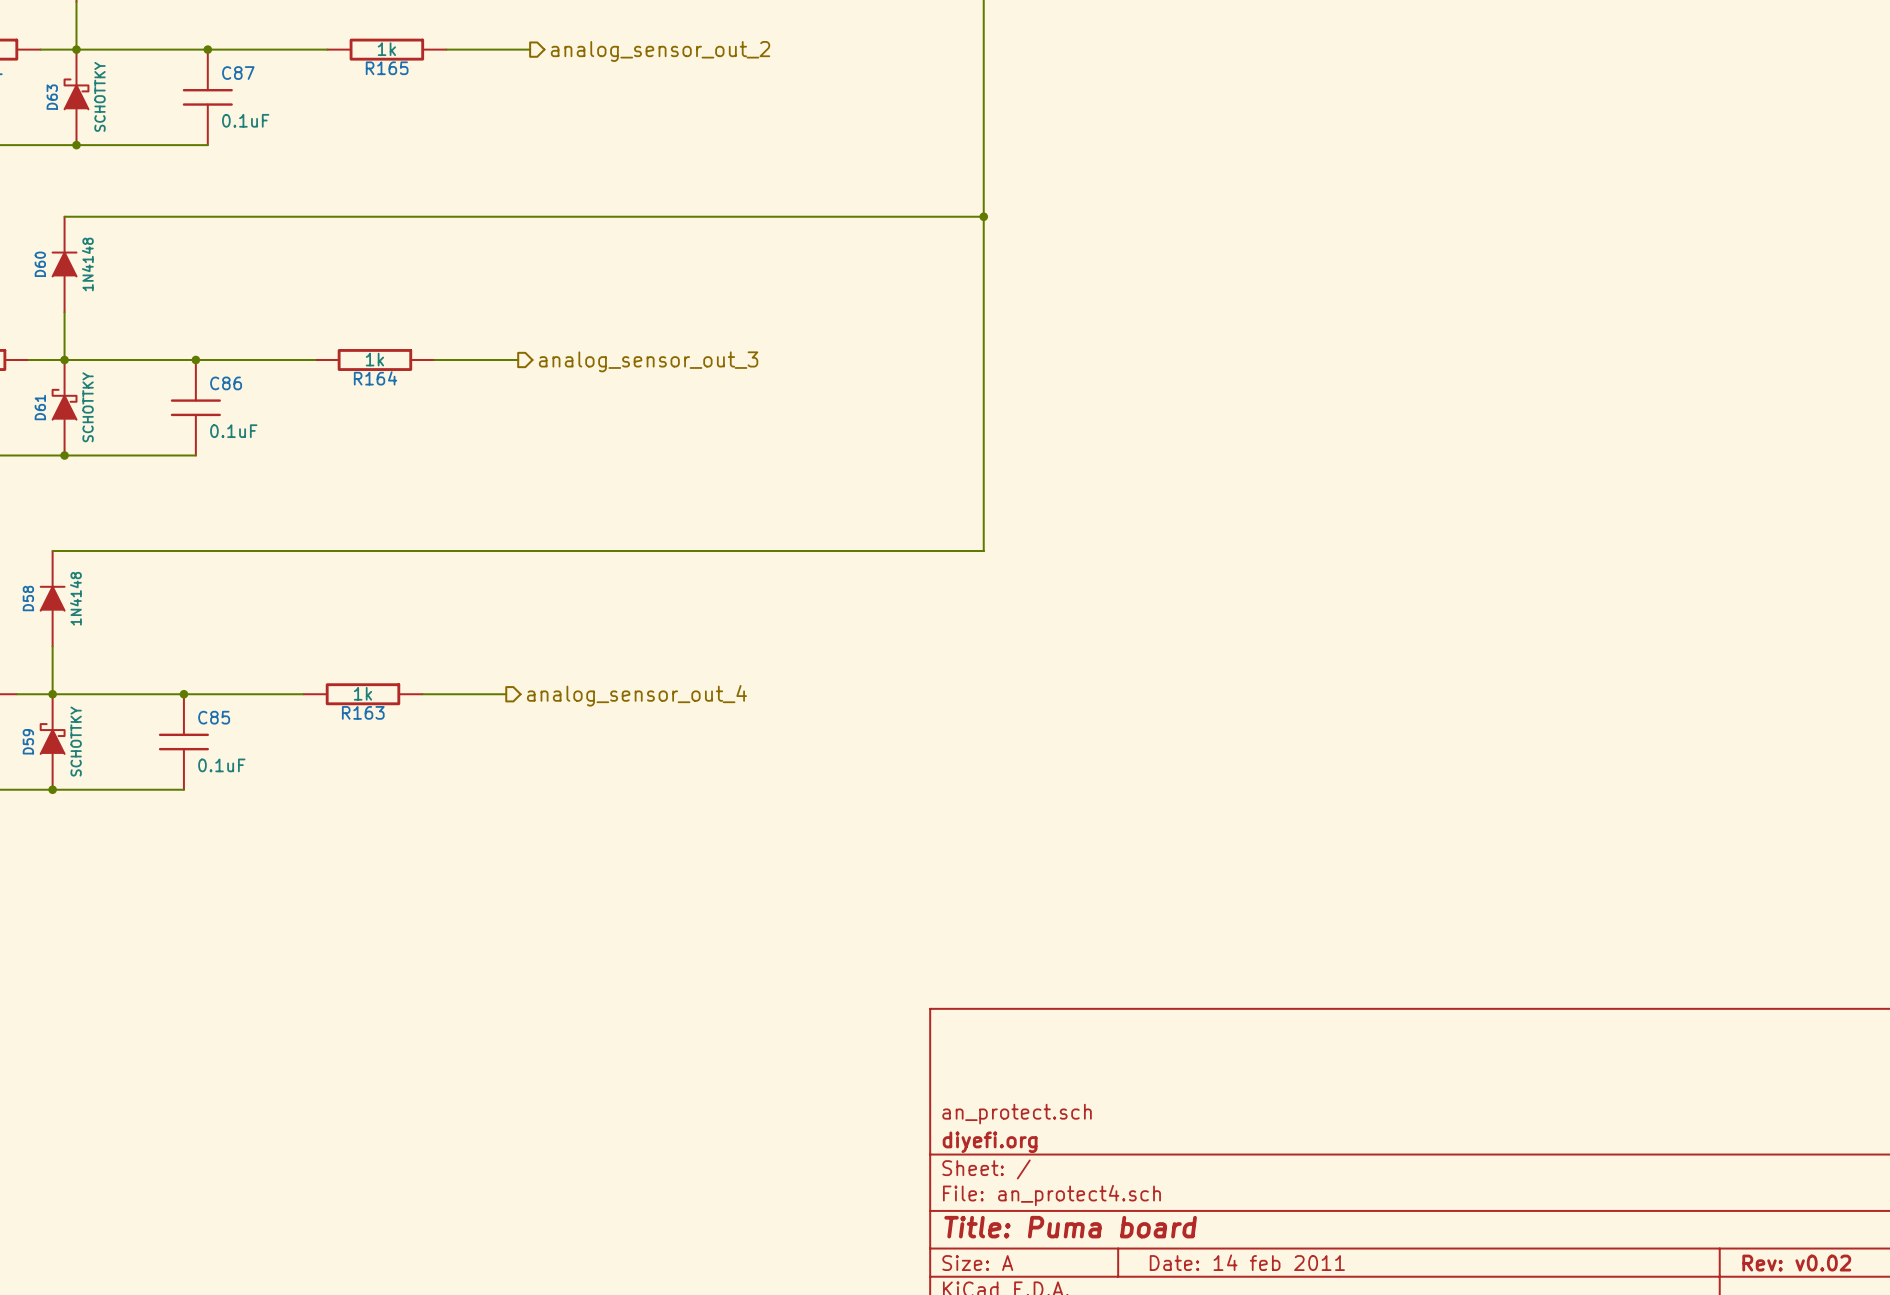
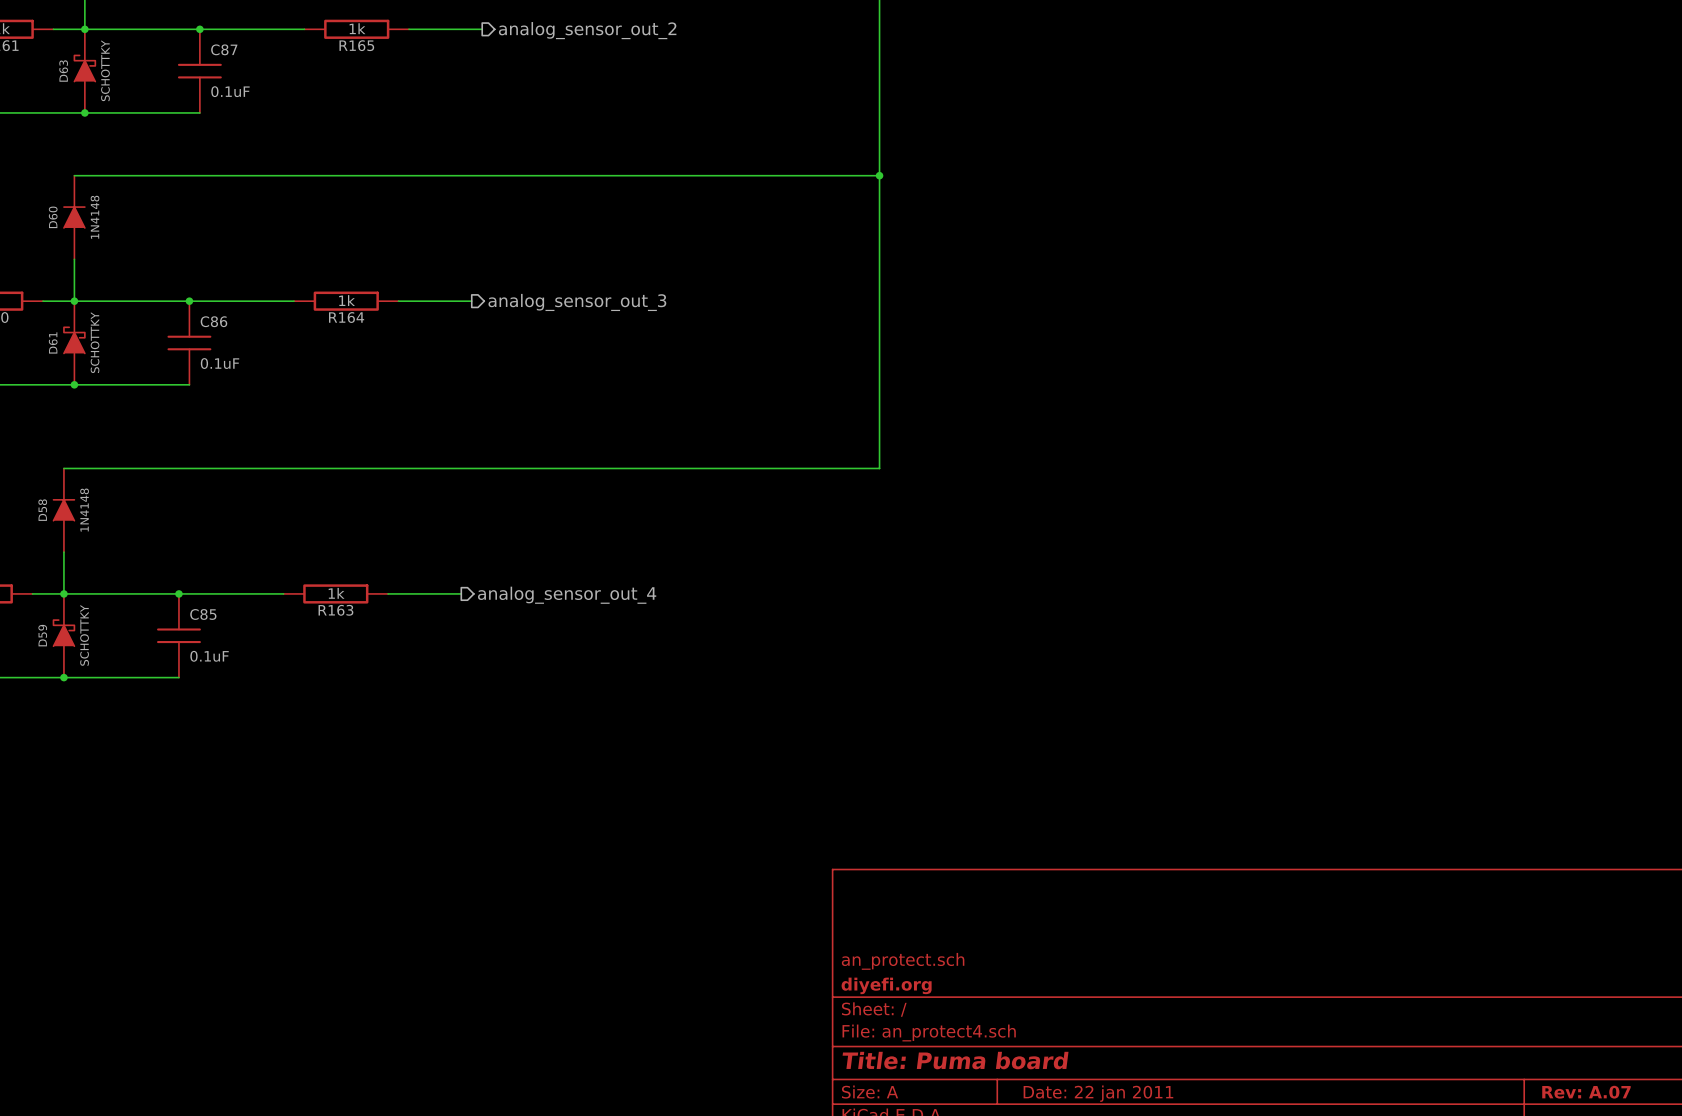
title block: Date: 14 feb 2011 (1247, 1262) -> Date: 22 jan 2011 (1098, 1093)
title block: Rev: v0.02 (1796, 1263) -> Rev: A.07 (1586, 1092)

